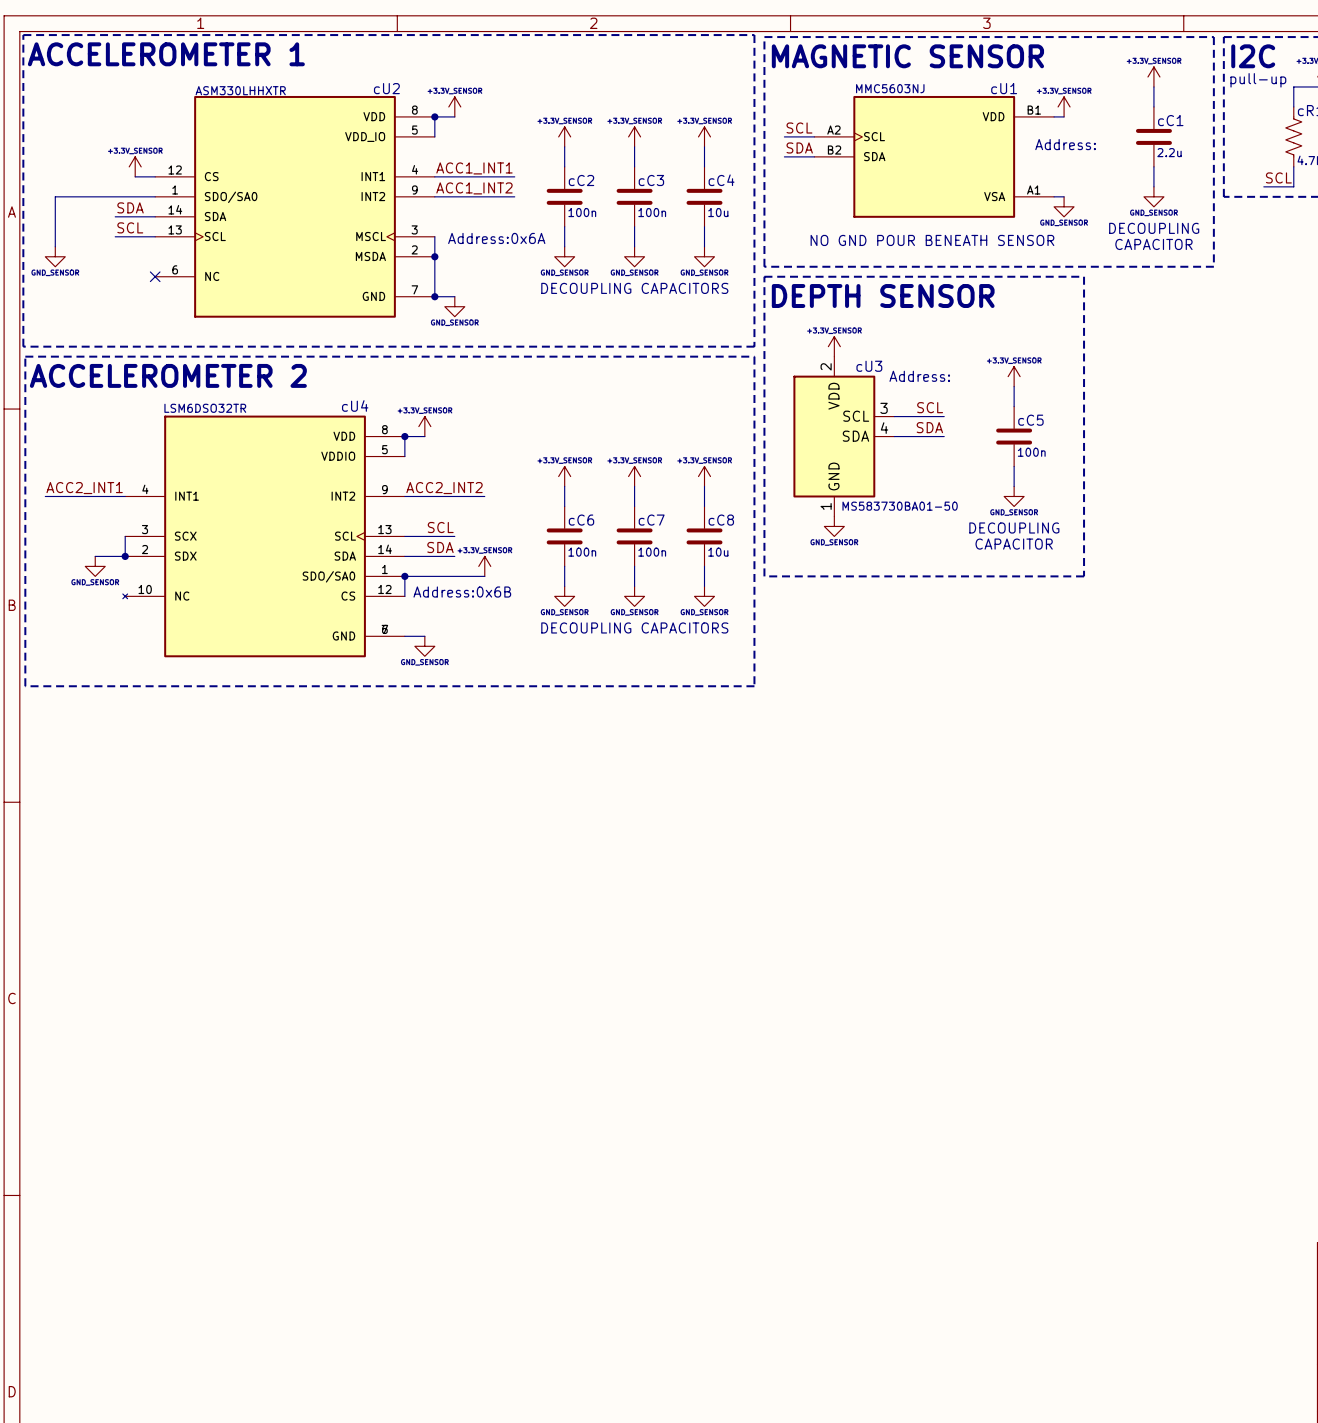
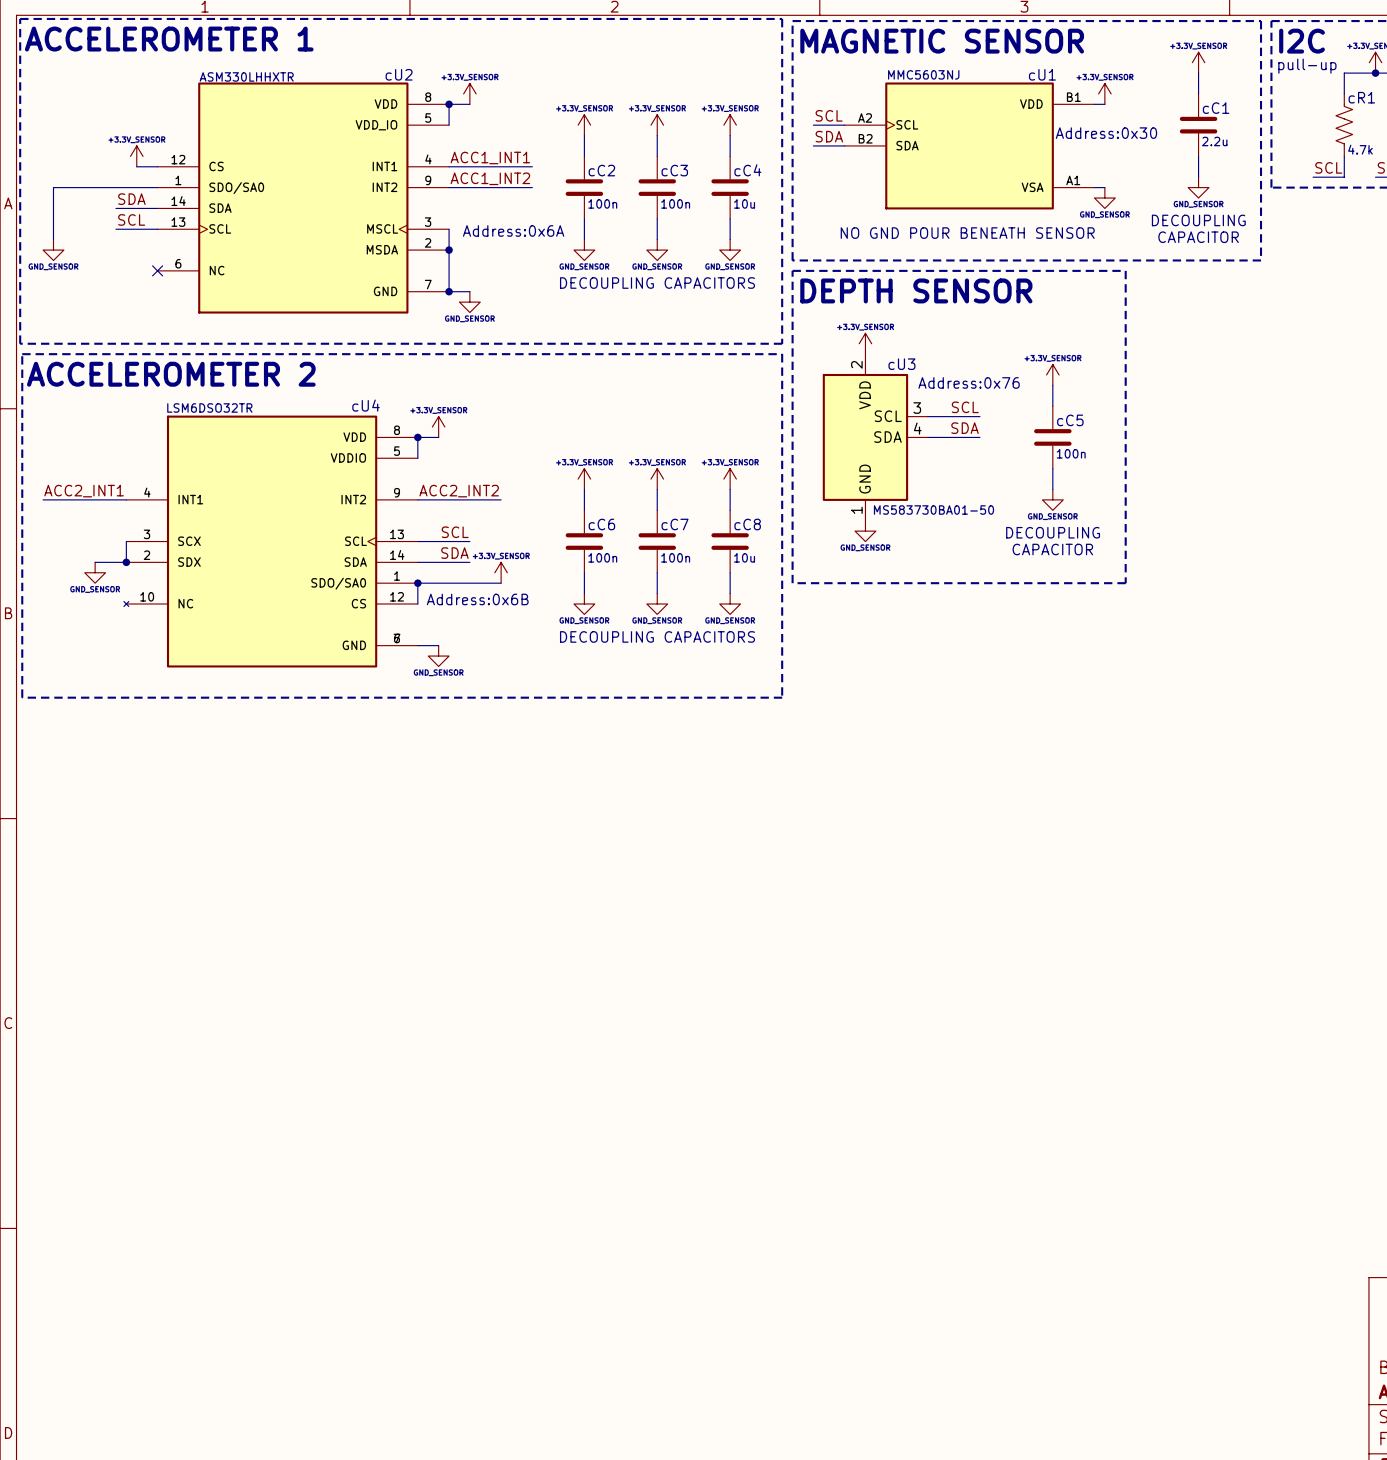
text: Address: (1065, 144) -> Address:0x30 (1106, 133)
text: Address: (919, 376) -> Address:0x76 (969, 382)

